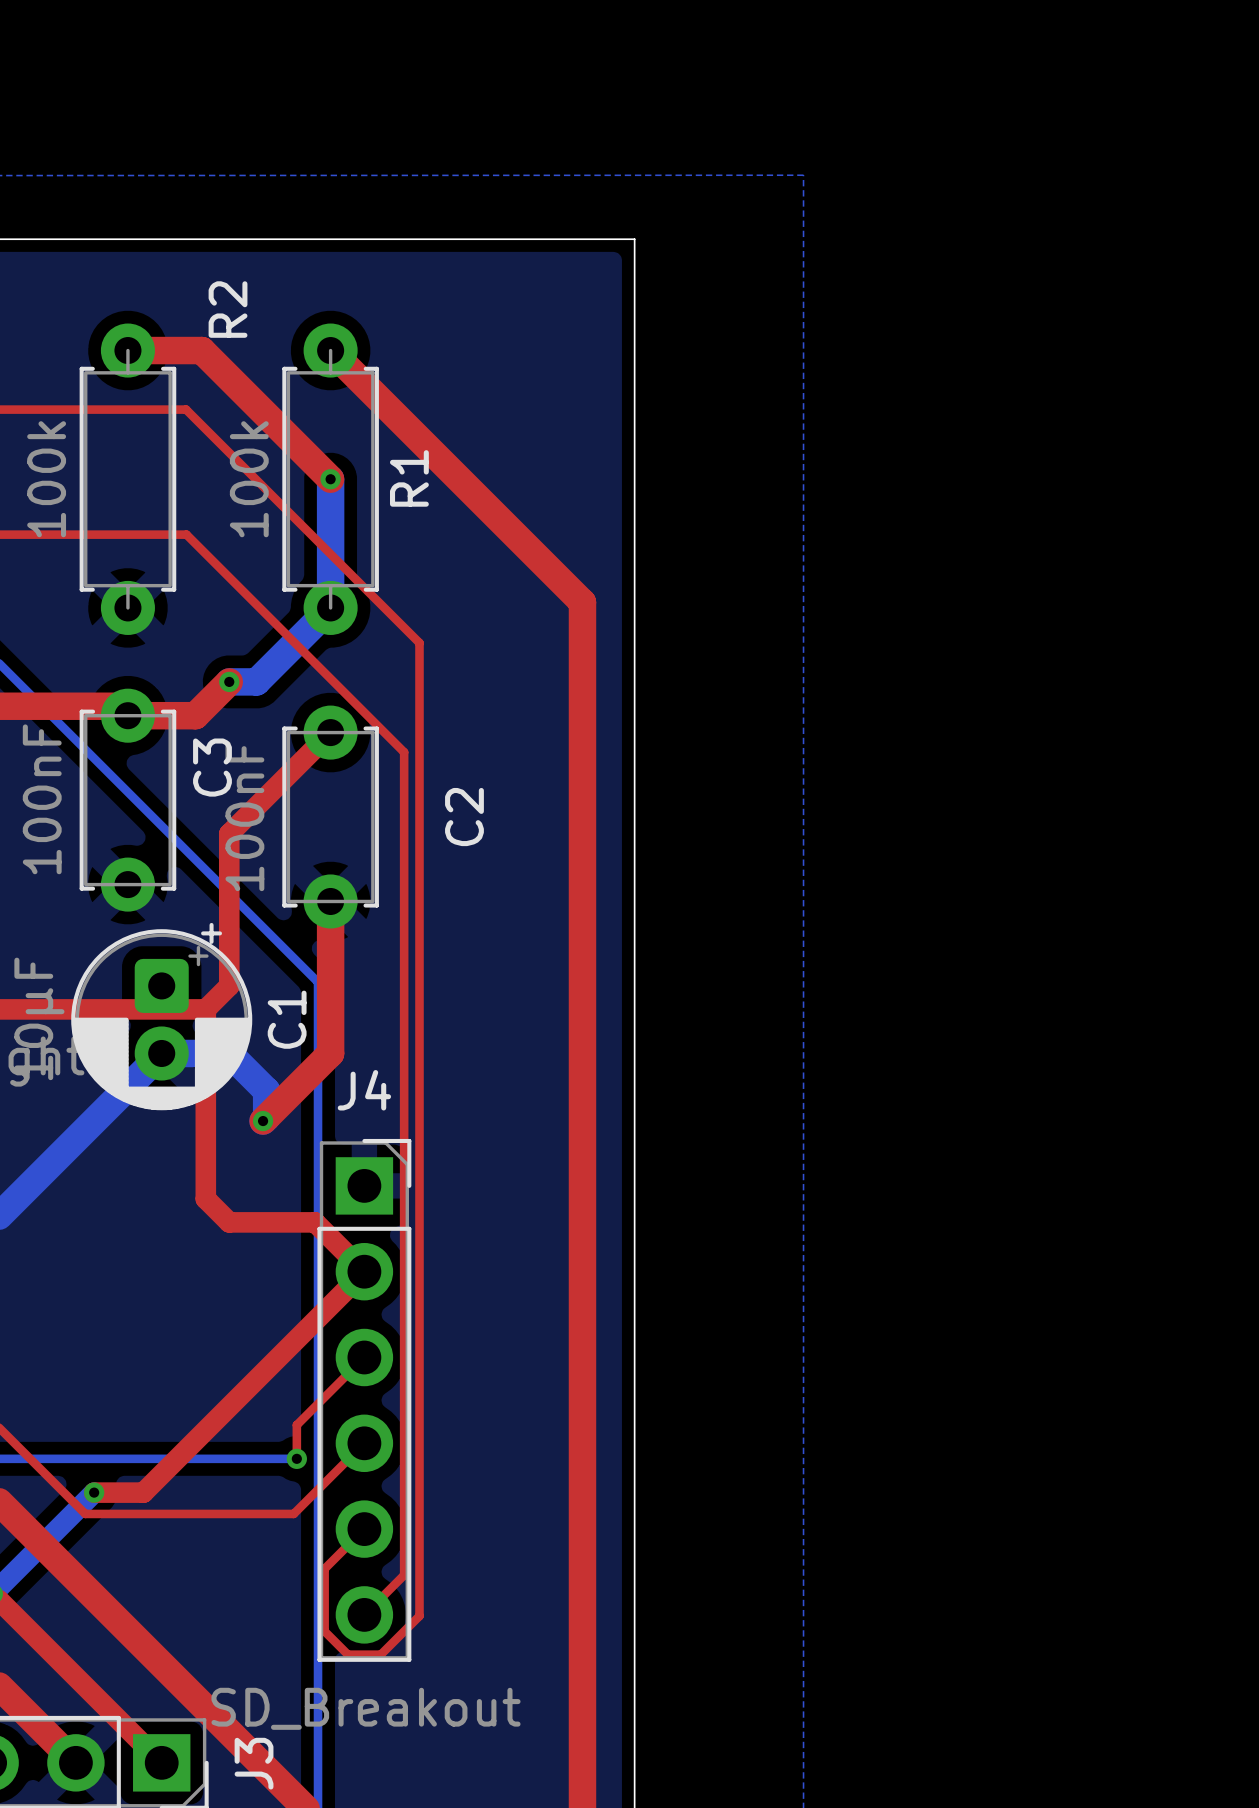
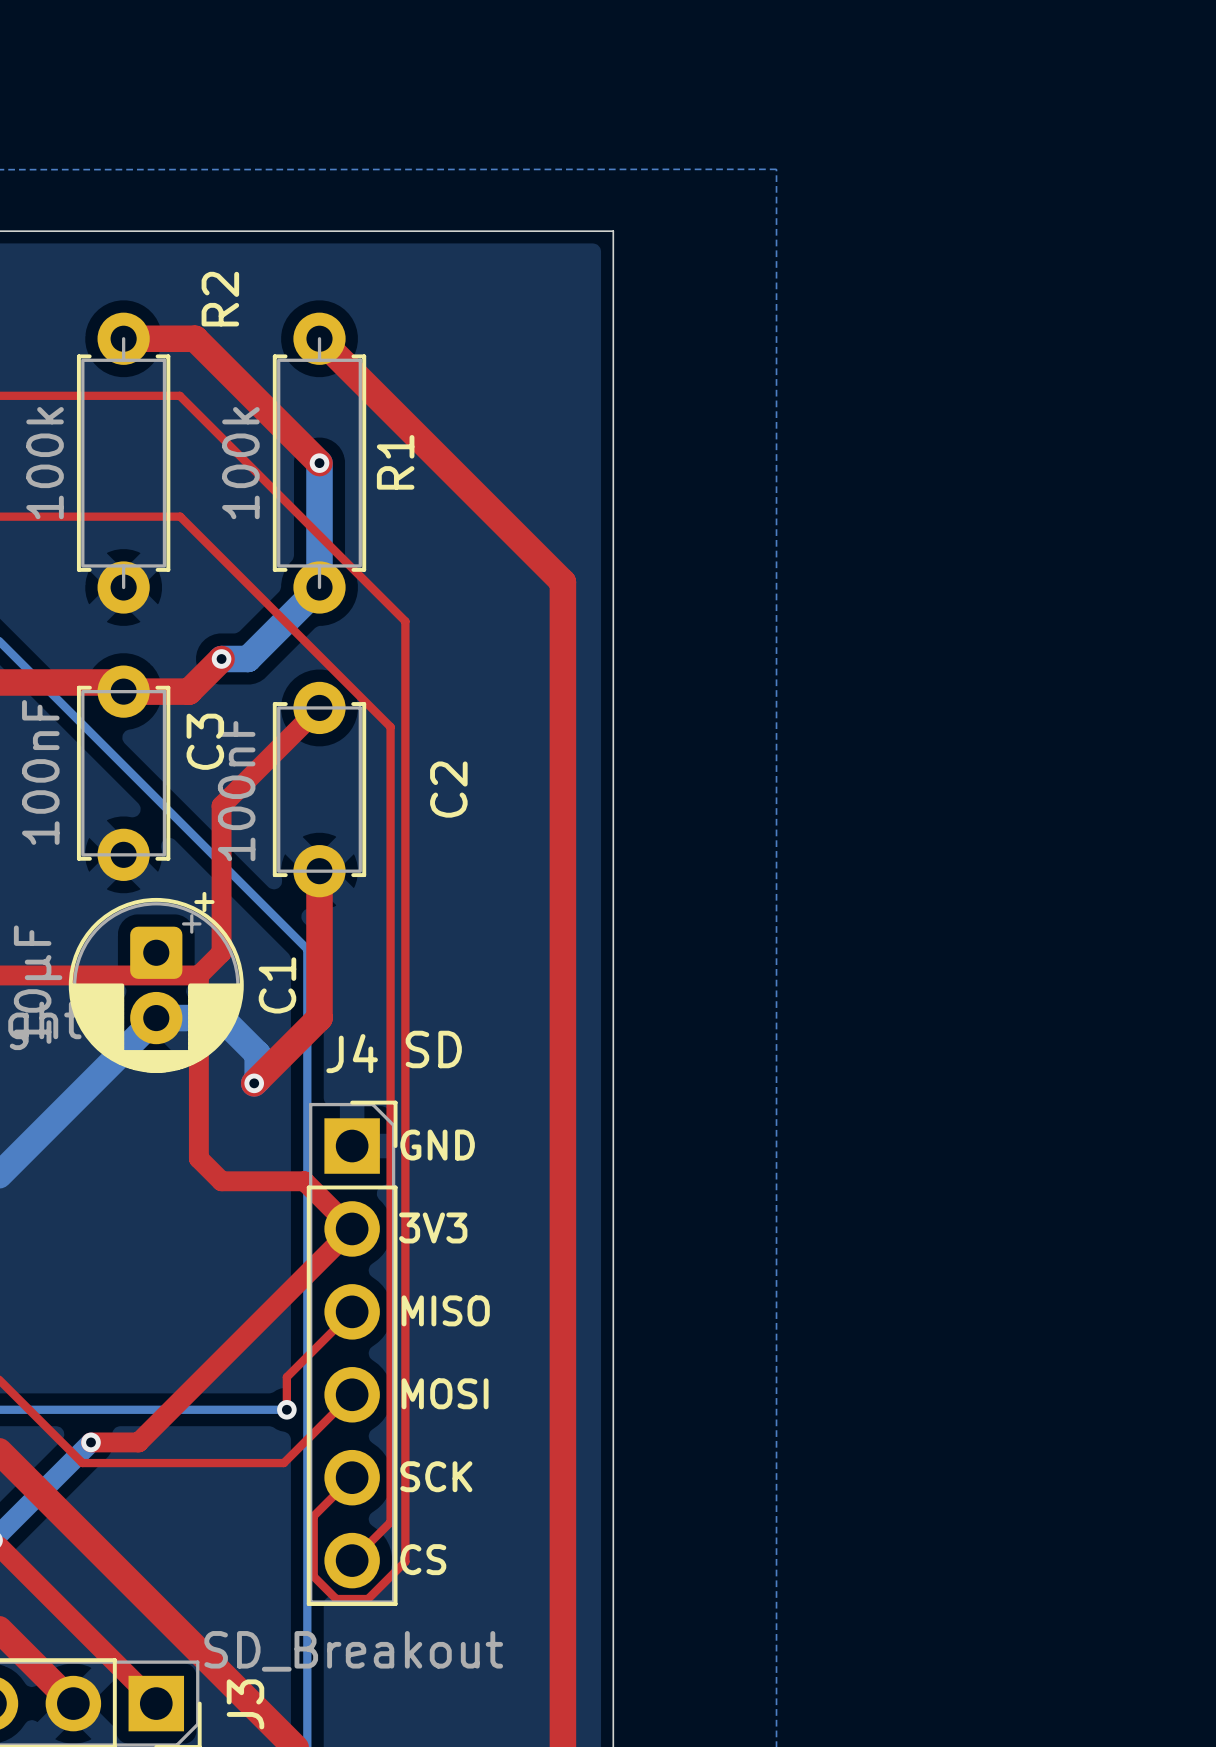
text: none -> SD (433, 1049)
text: none -> GND (437, 1145)
text: none -> 3V3 (433, 1227)
text: none -> MISO (445, 1310)
text: none -> MOSI (445, 1393)
text: none -> SCK (436, 1476)
text: none -> CS (423, 1559)

